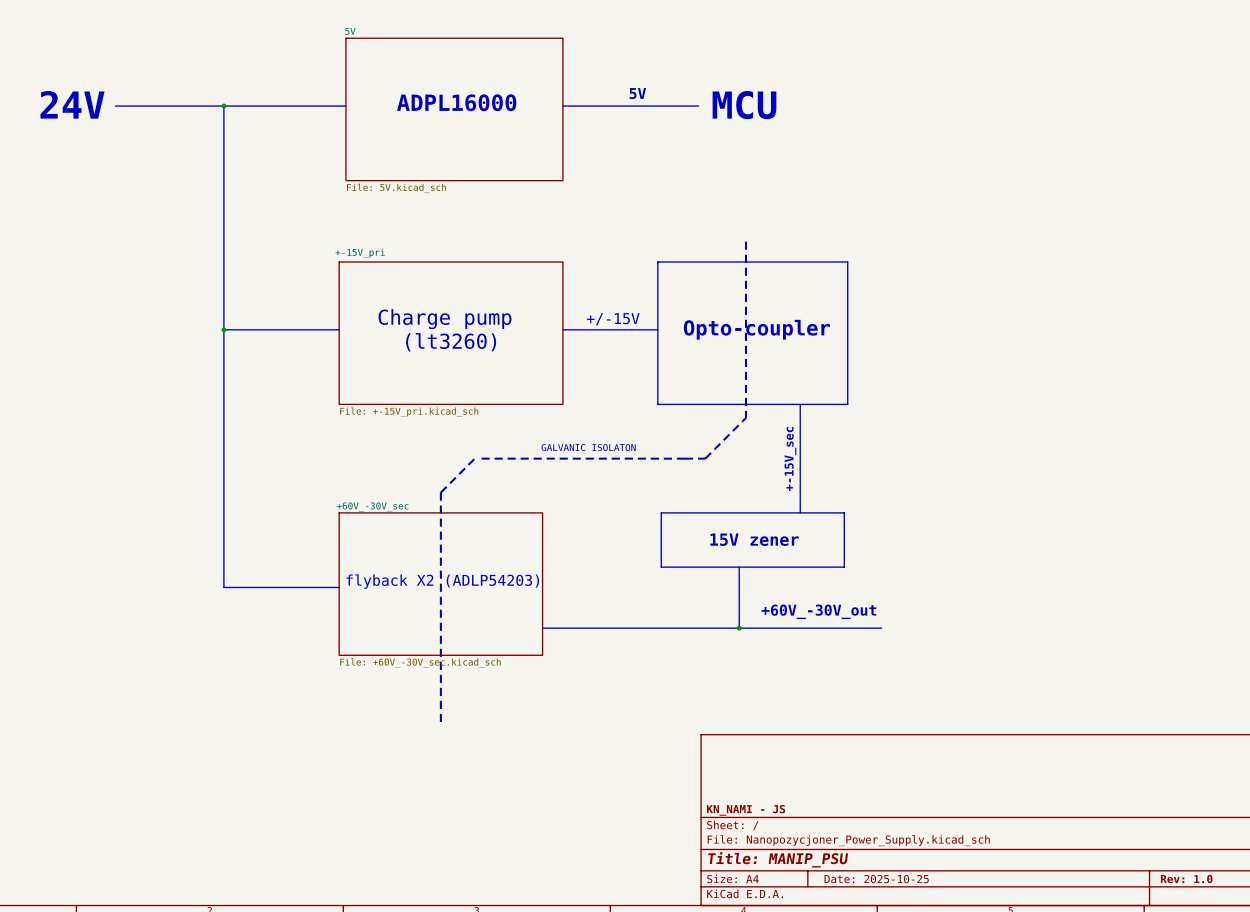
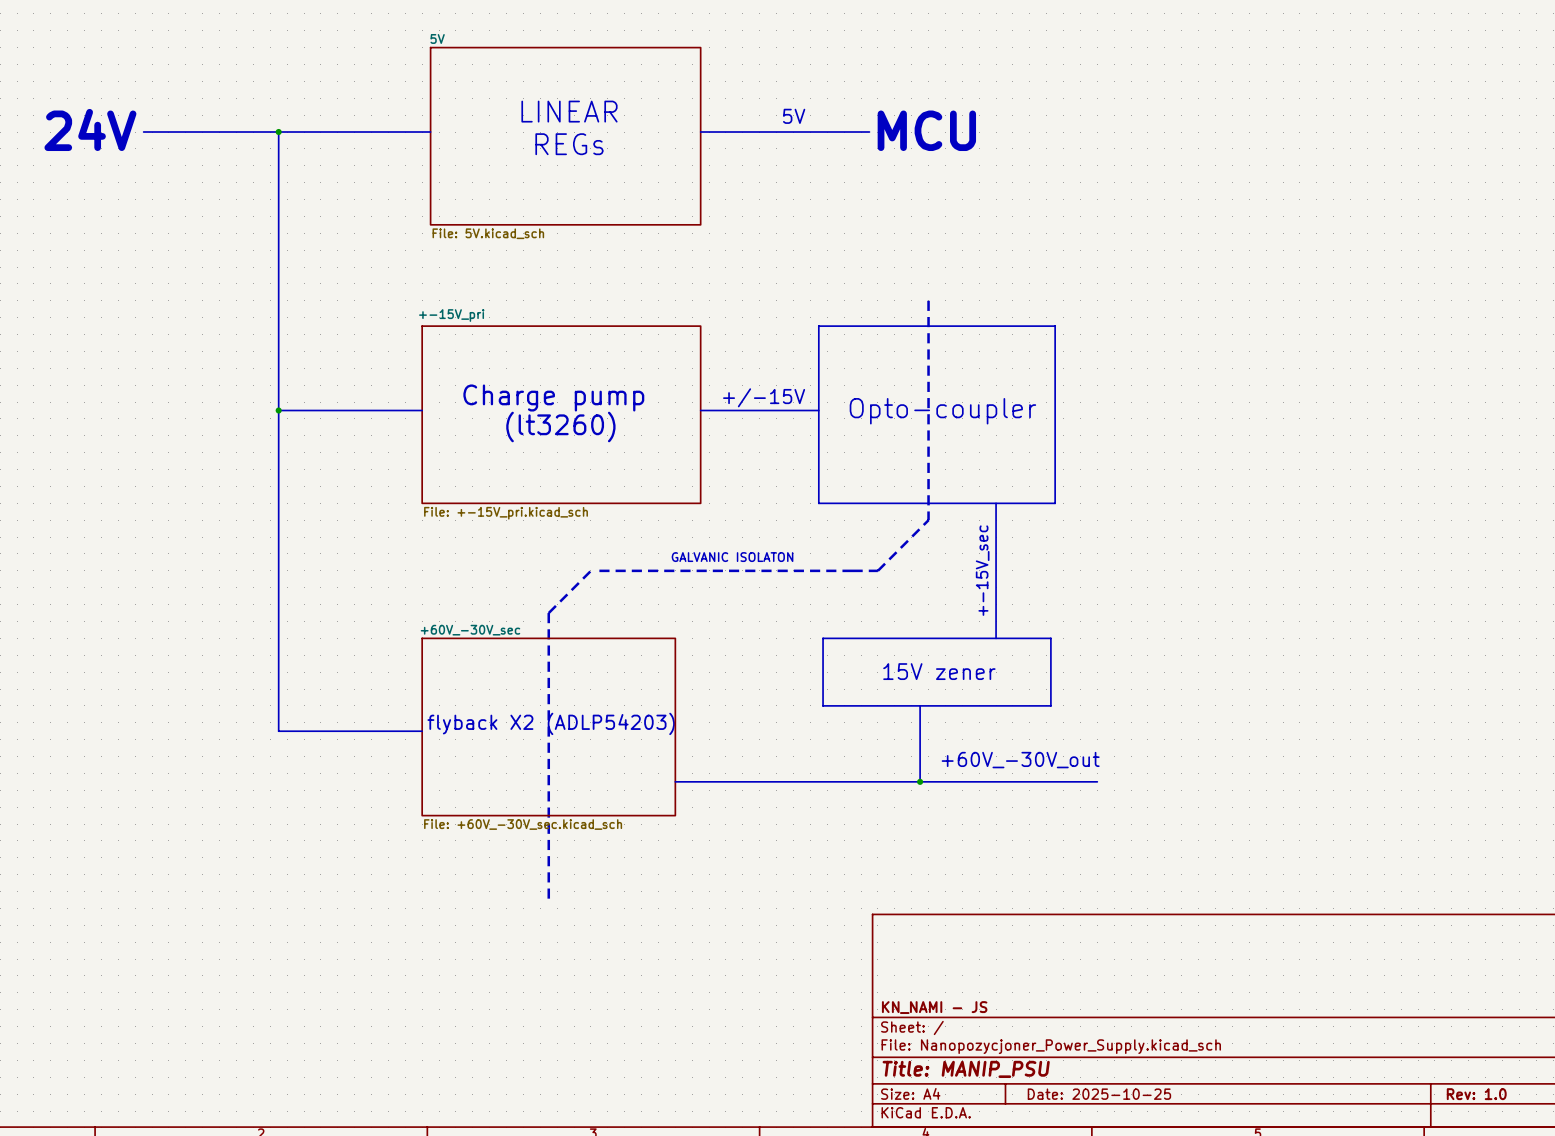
text: none -> LINEAR (569, 111)
text: ADPL16000 (456, 102) -> none
text: none -> REGs (569, 144)

